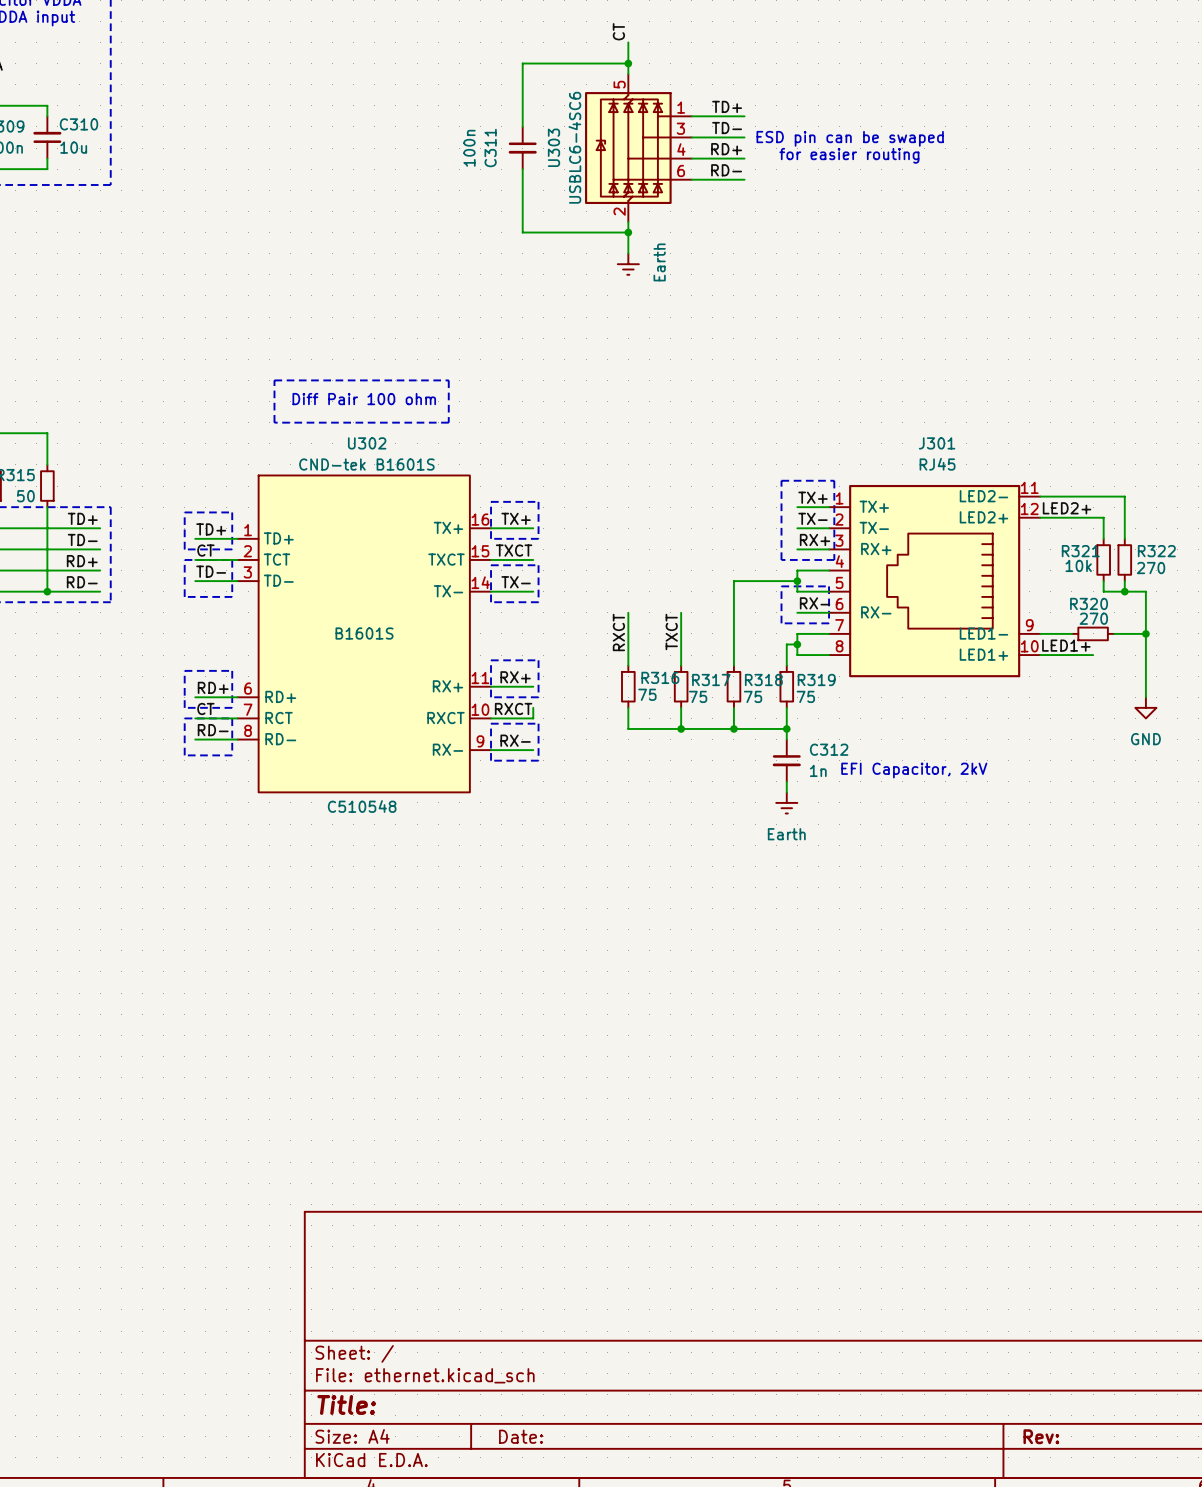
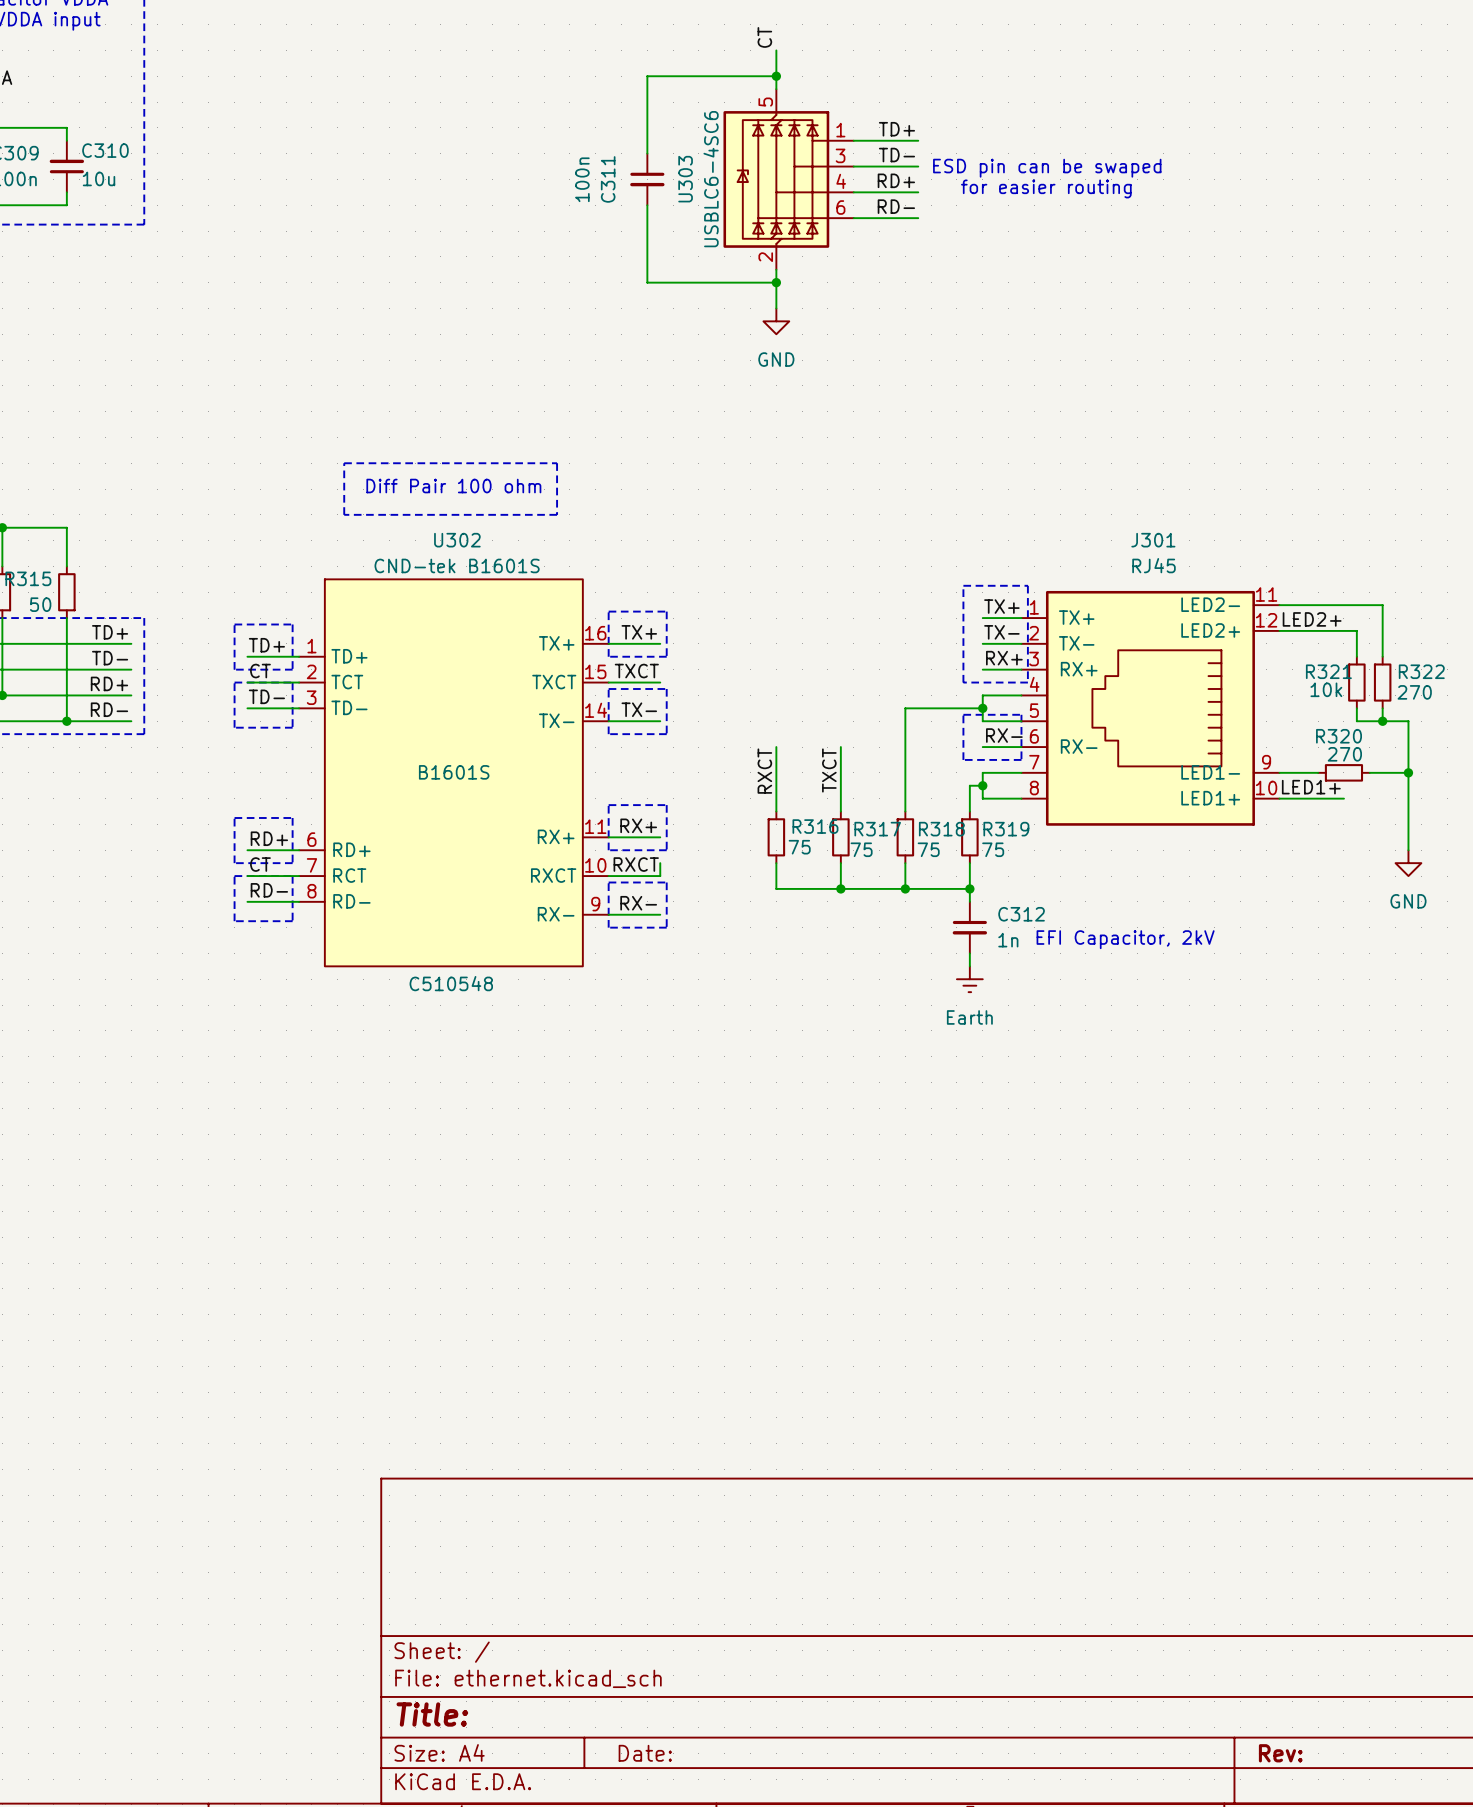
power symbol: Earth (628, 264) -> GND (776, 321)

